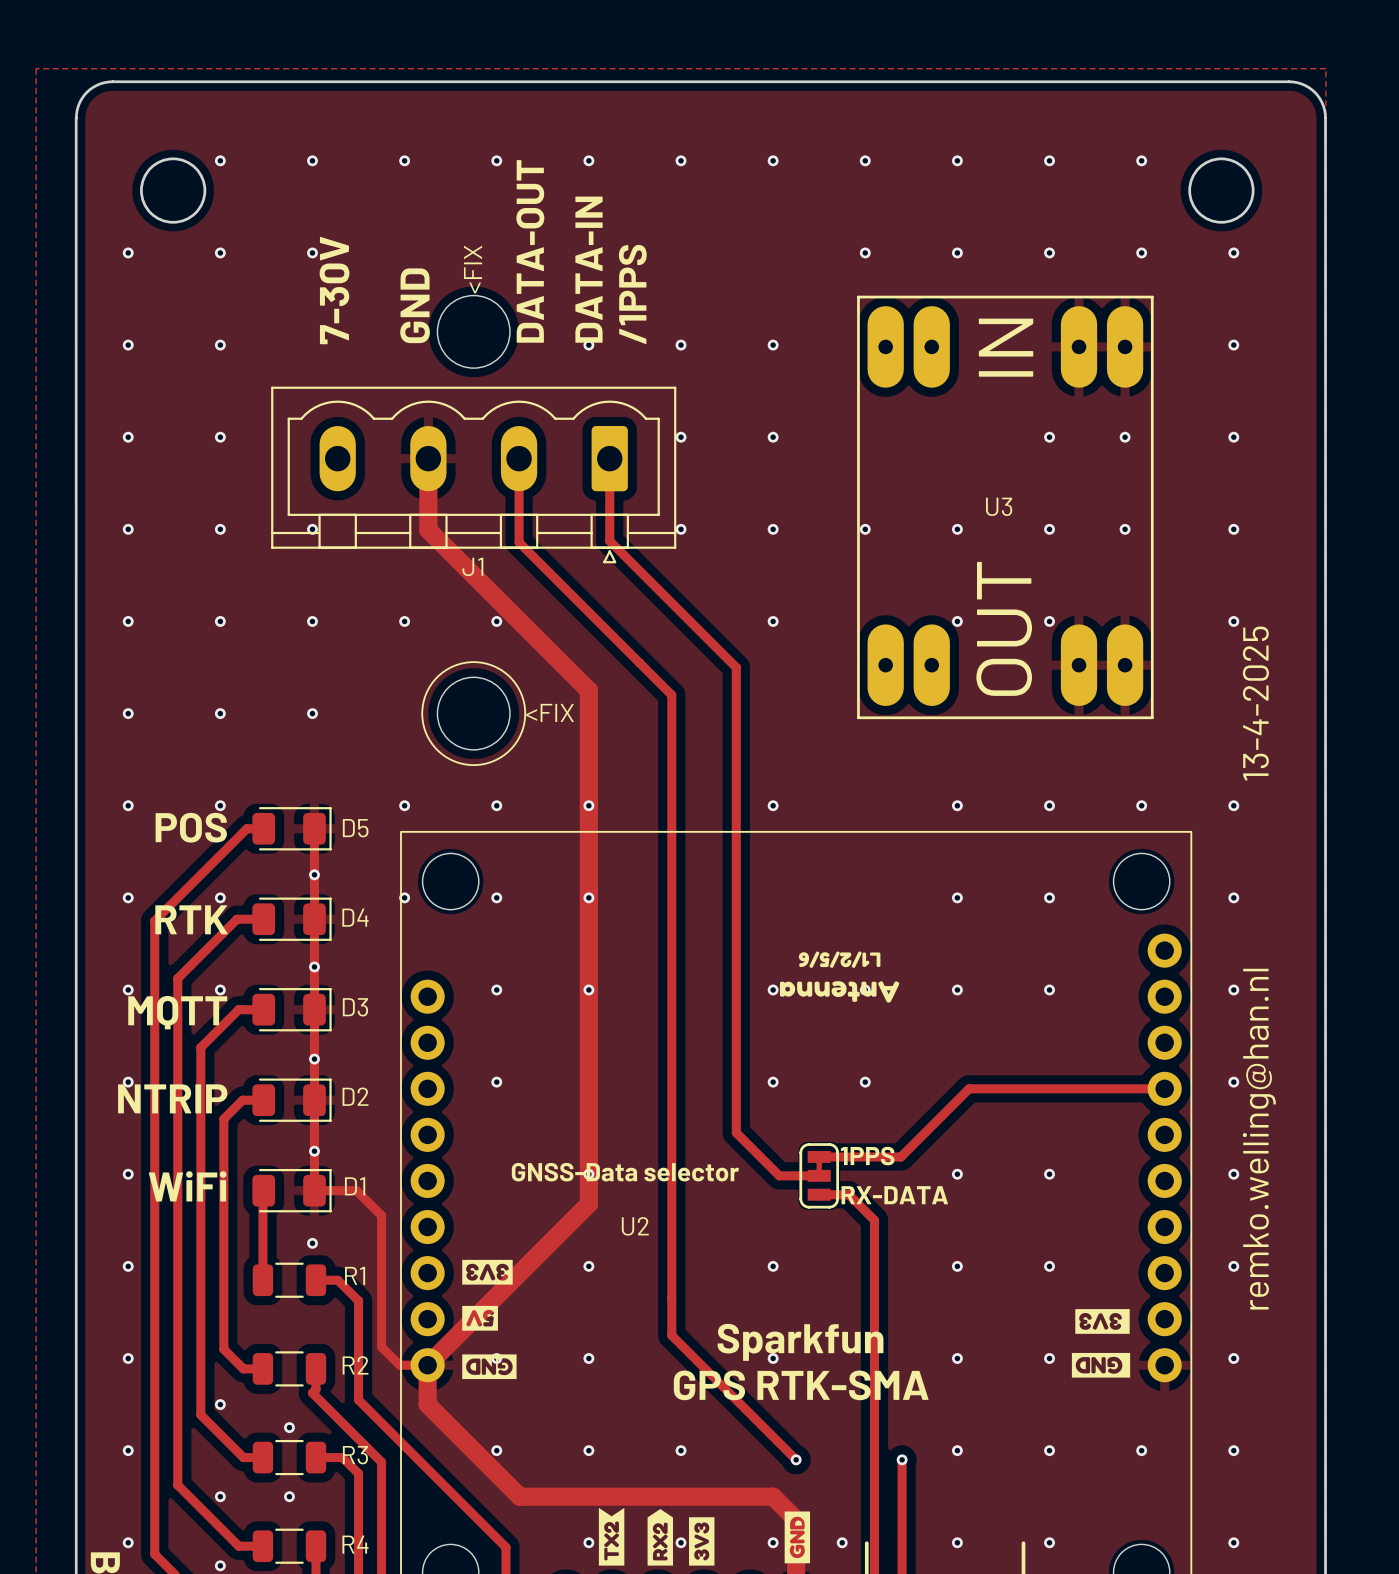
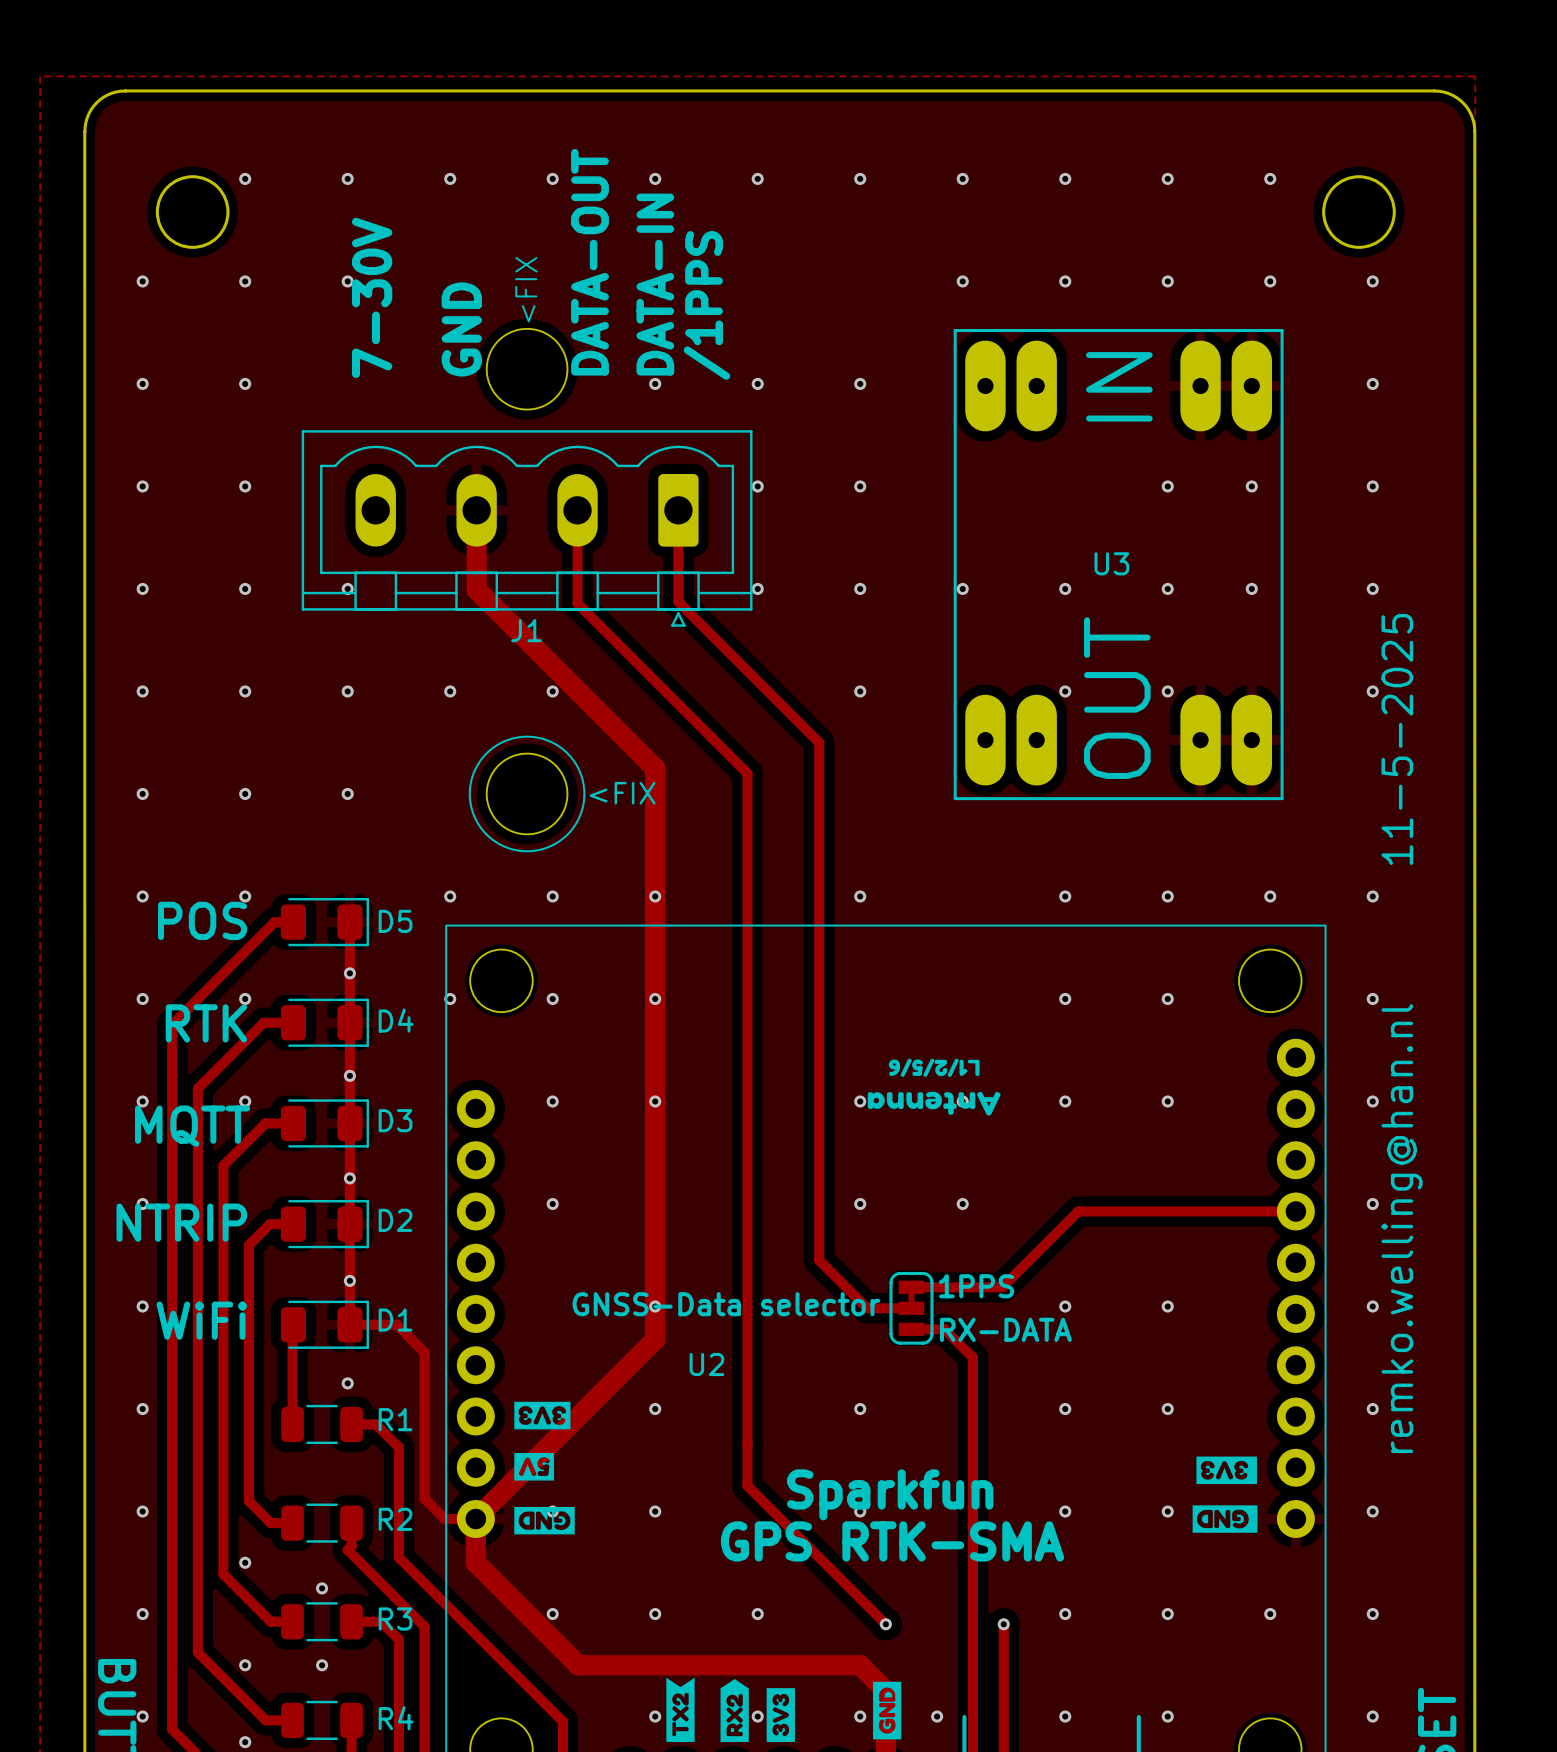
text: 13-4-2025 (1255, 703) -> 11-5-2025 (1397, 739)

